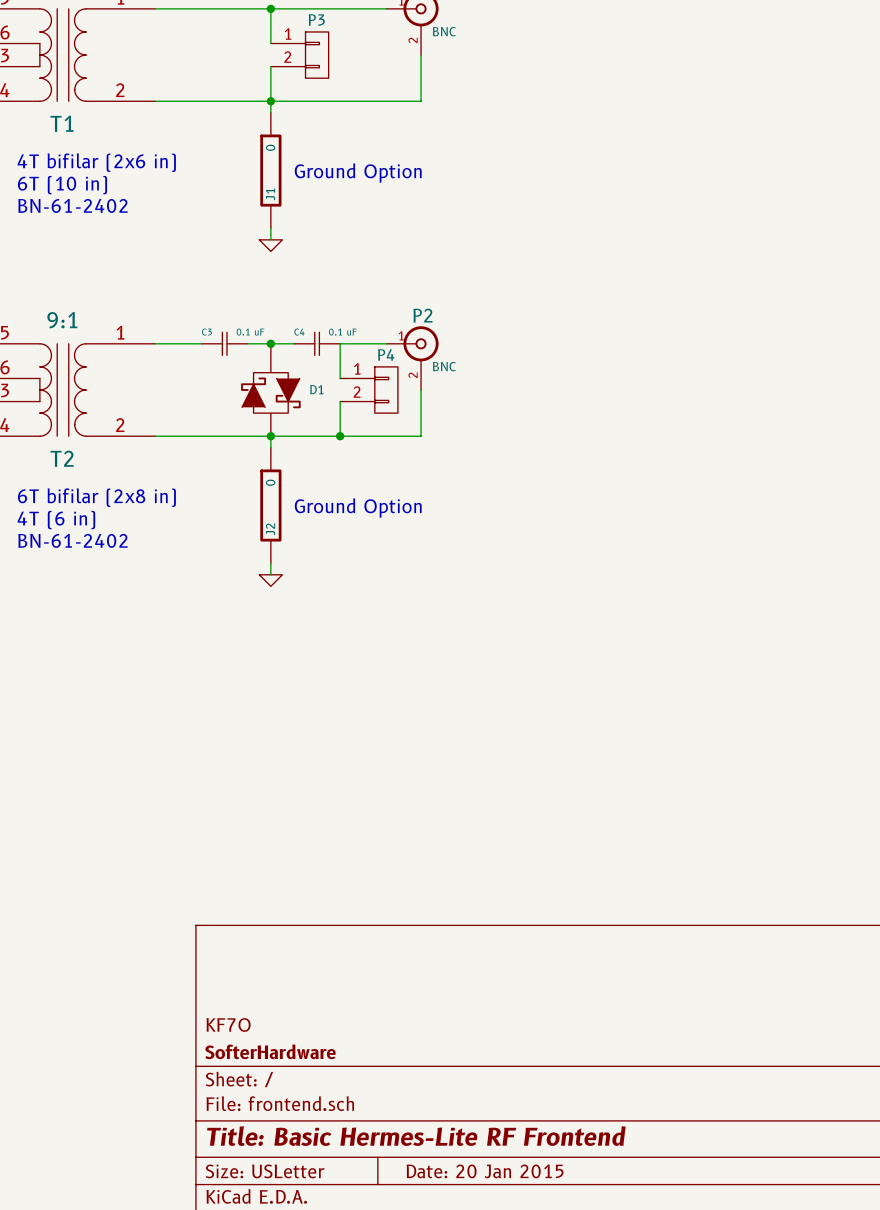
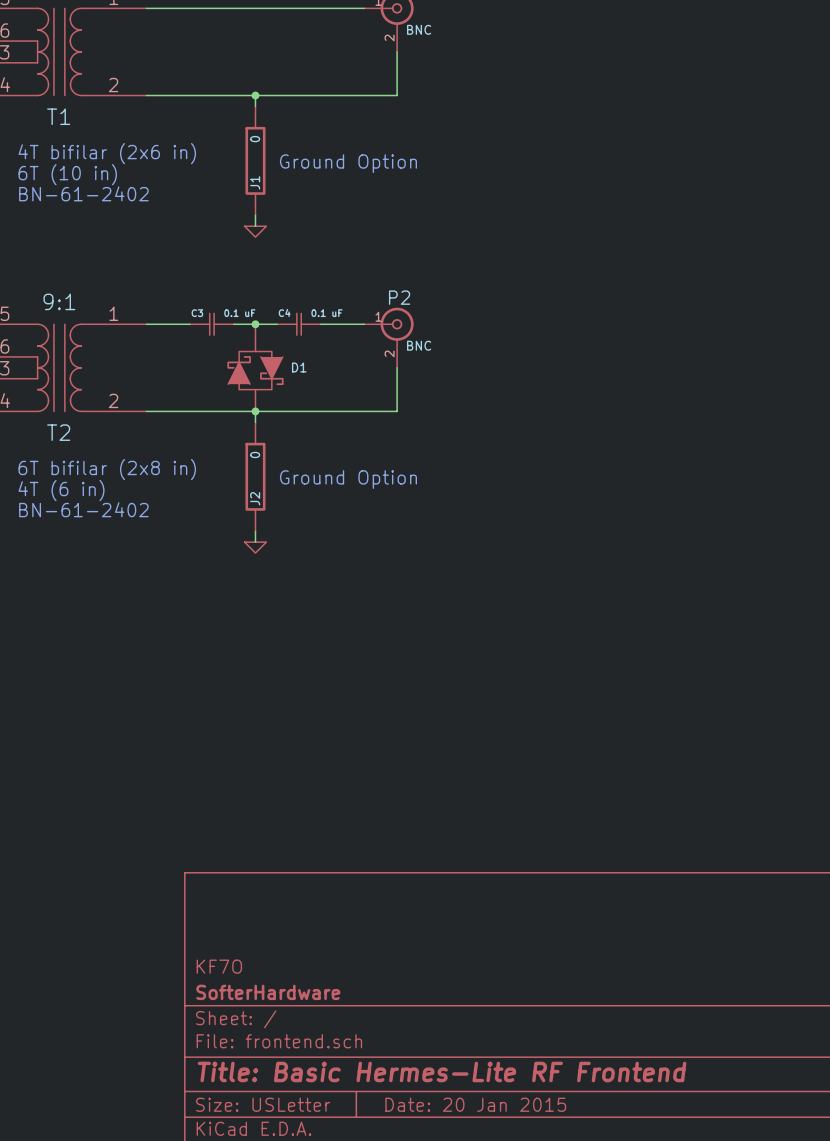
wire: (270, 8) (270, 43) -> none
junction: (270, 8) -> none
P3: (299, 55) -> none
wire: (270, 66) (270, 101) -> none
wire: (340, 343) (340, 378) -> none
P4: (369, 390) -> none
wire: (340, 401) (340, 436) -> none
junction: (340, 436) -> none

